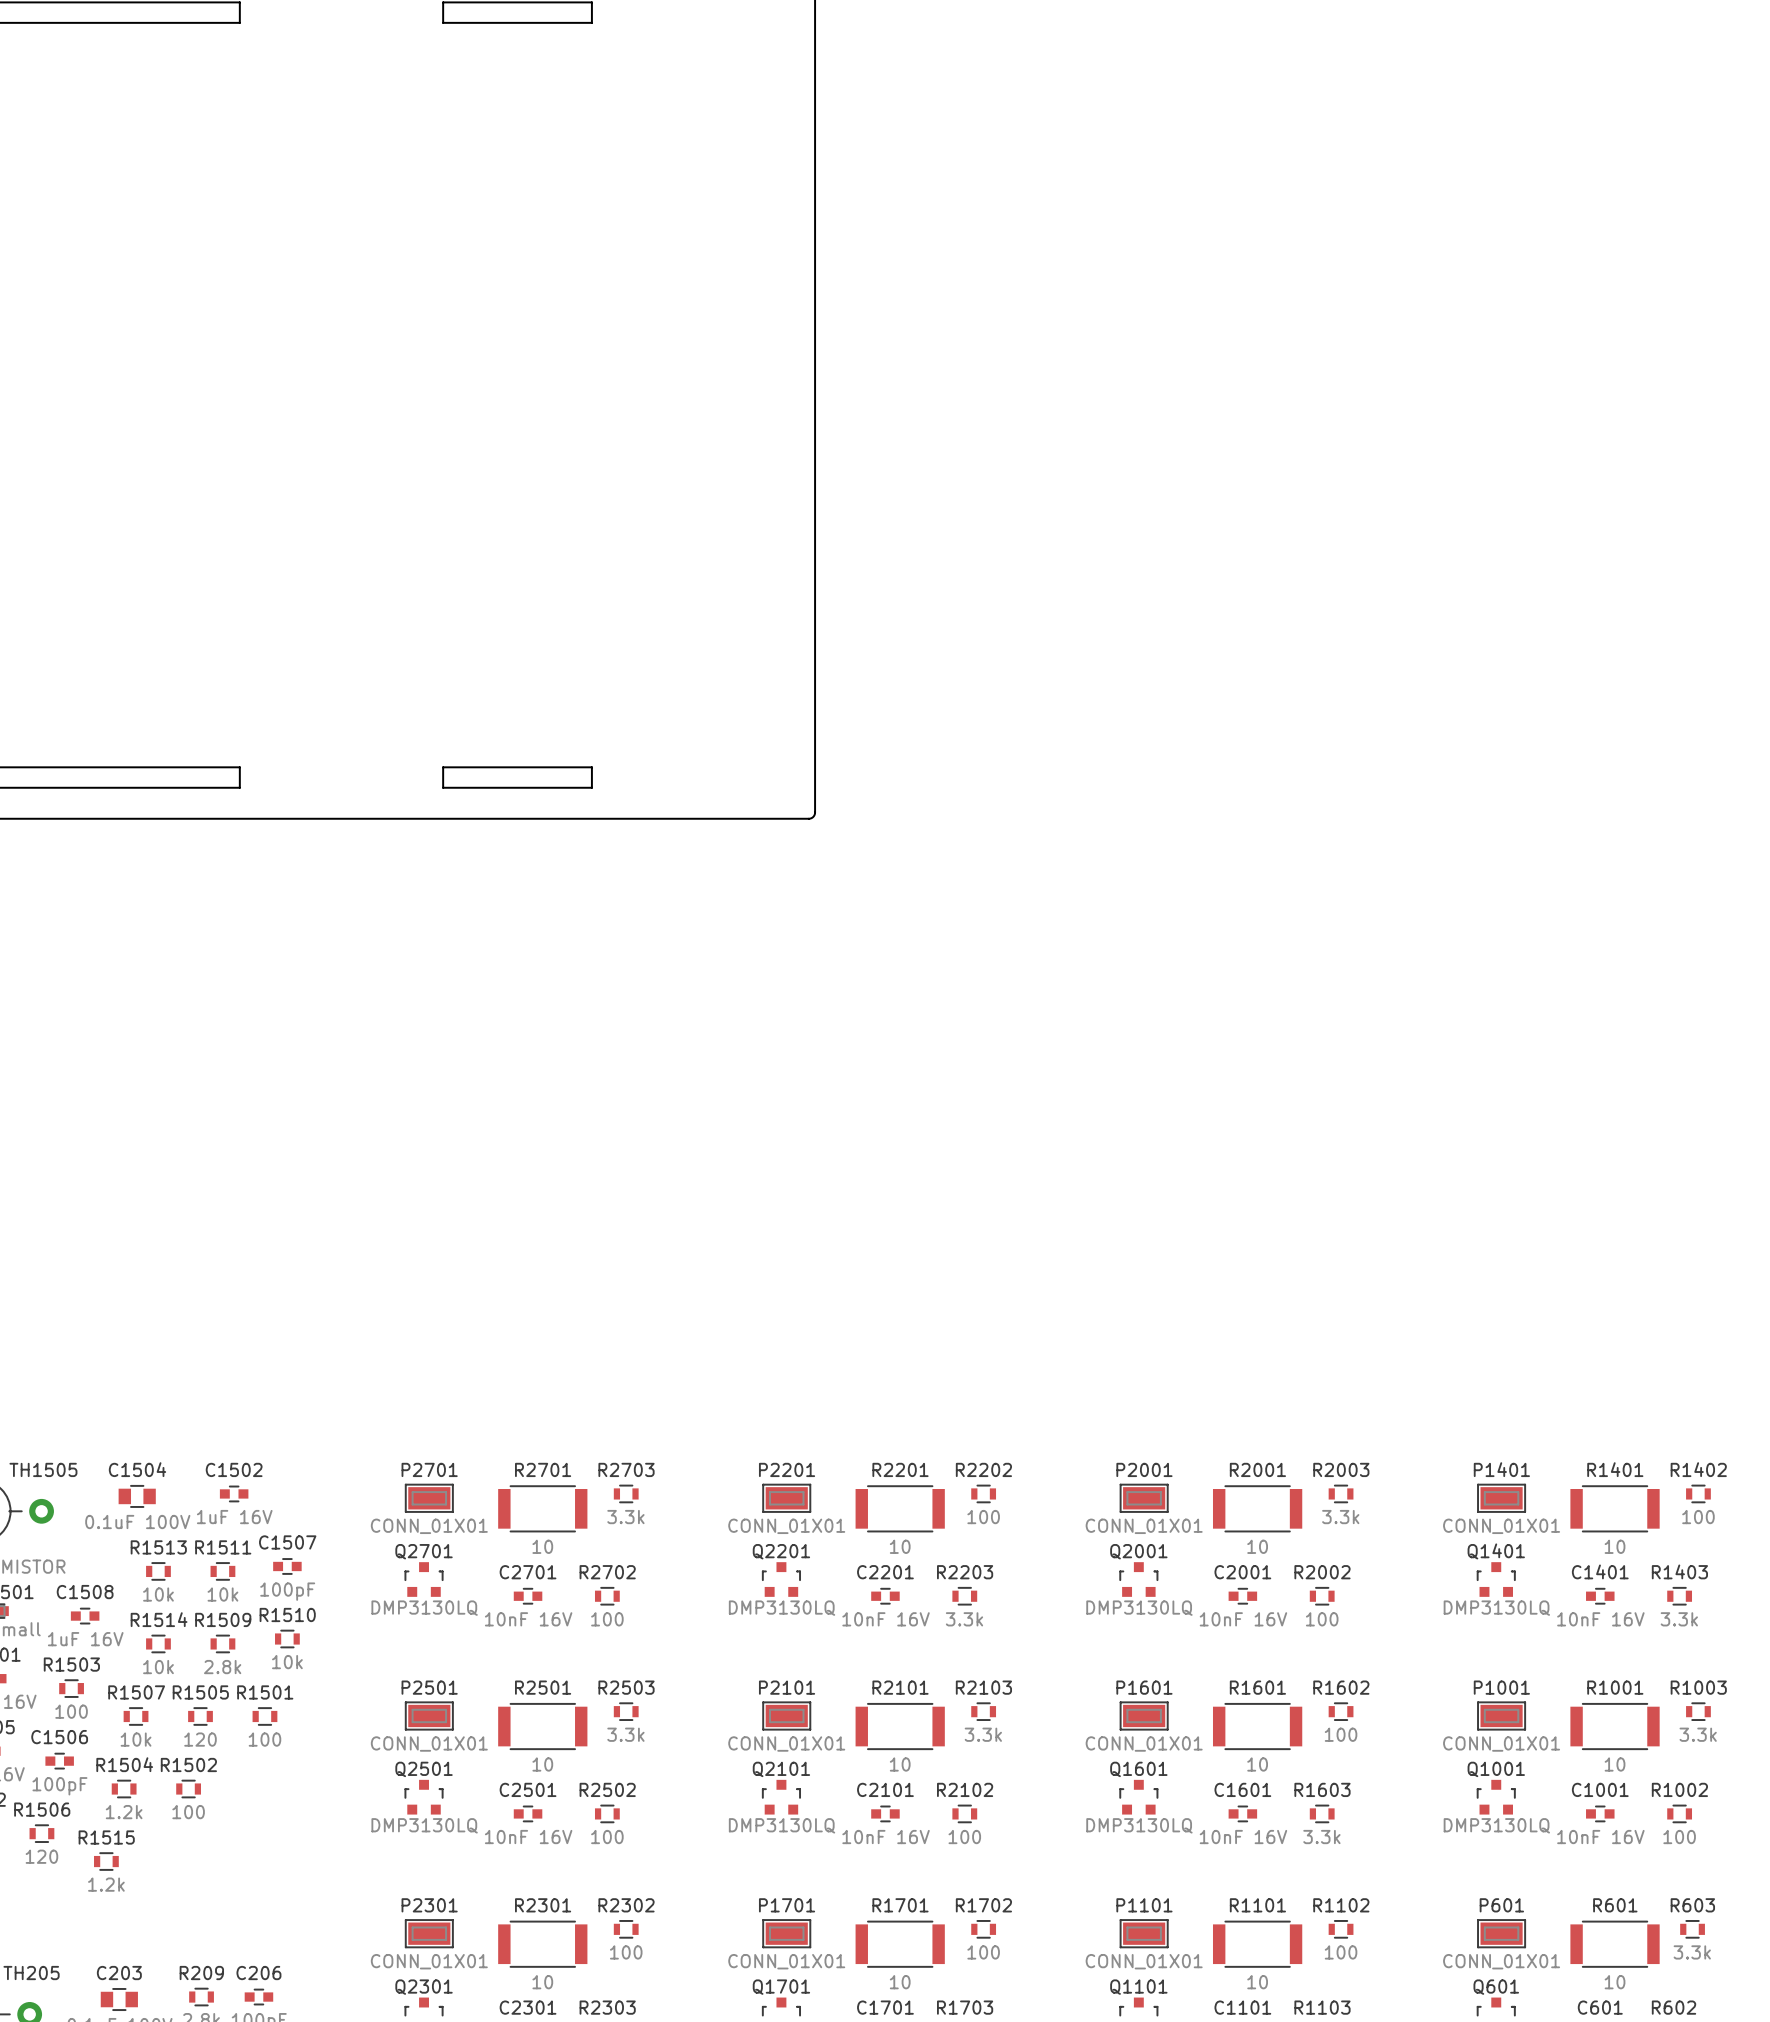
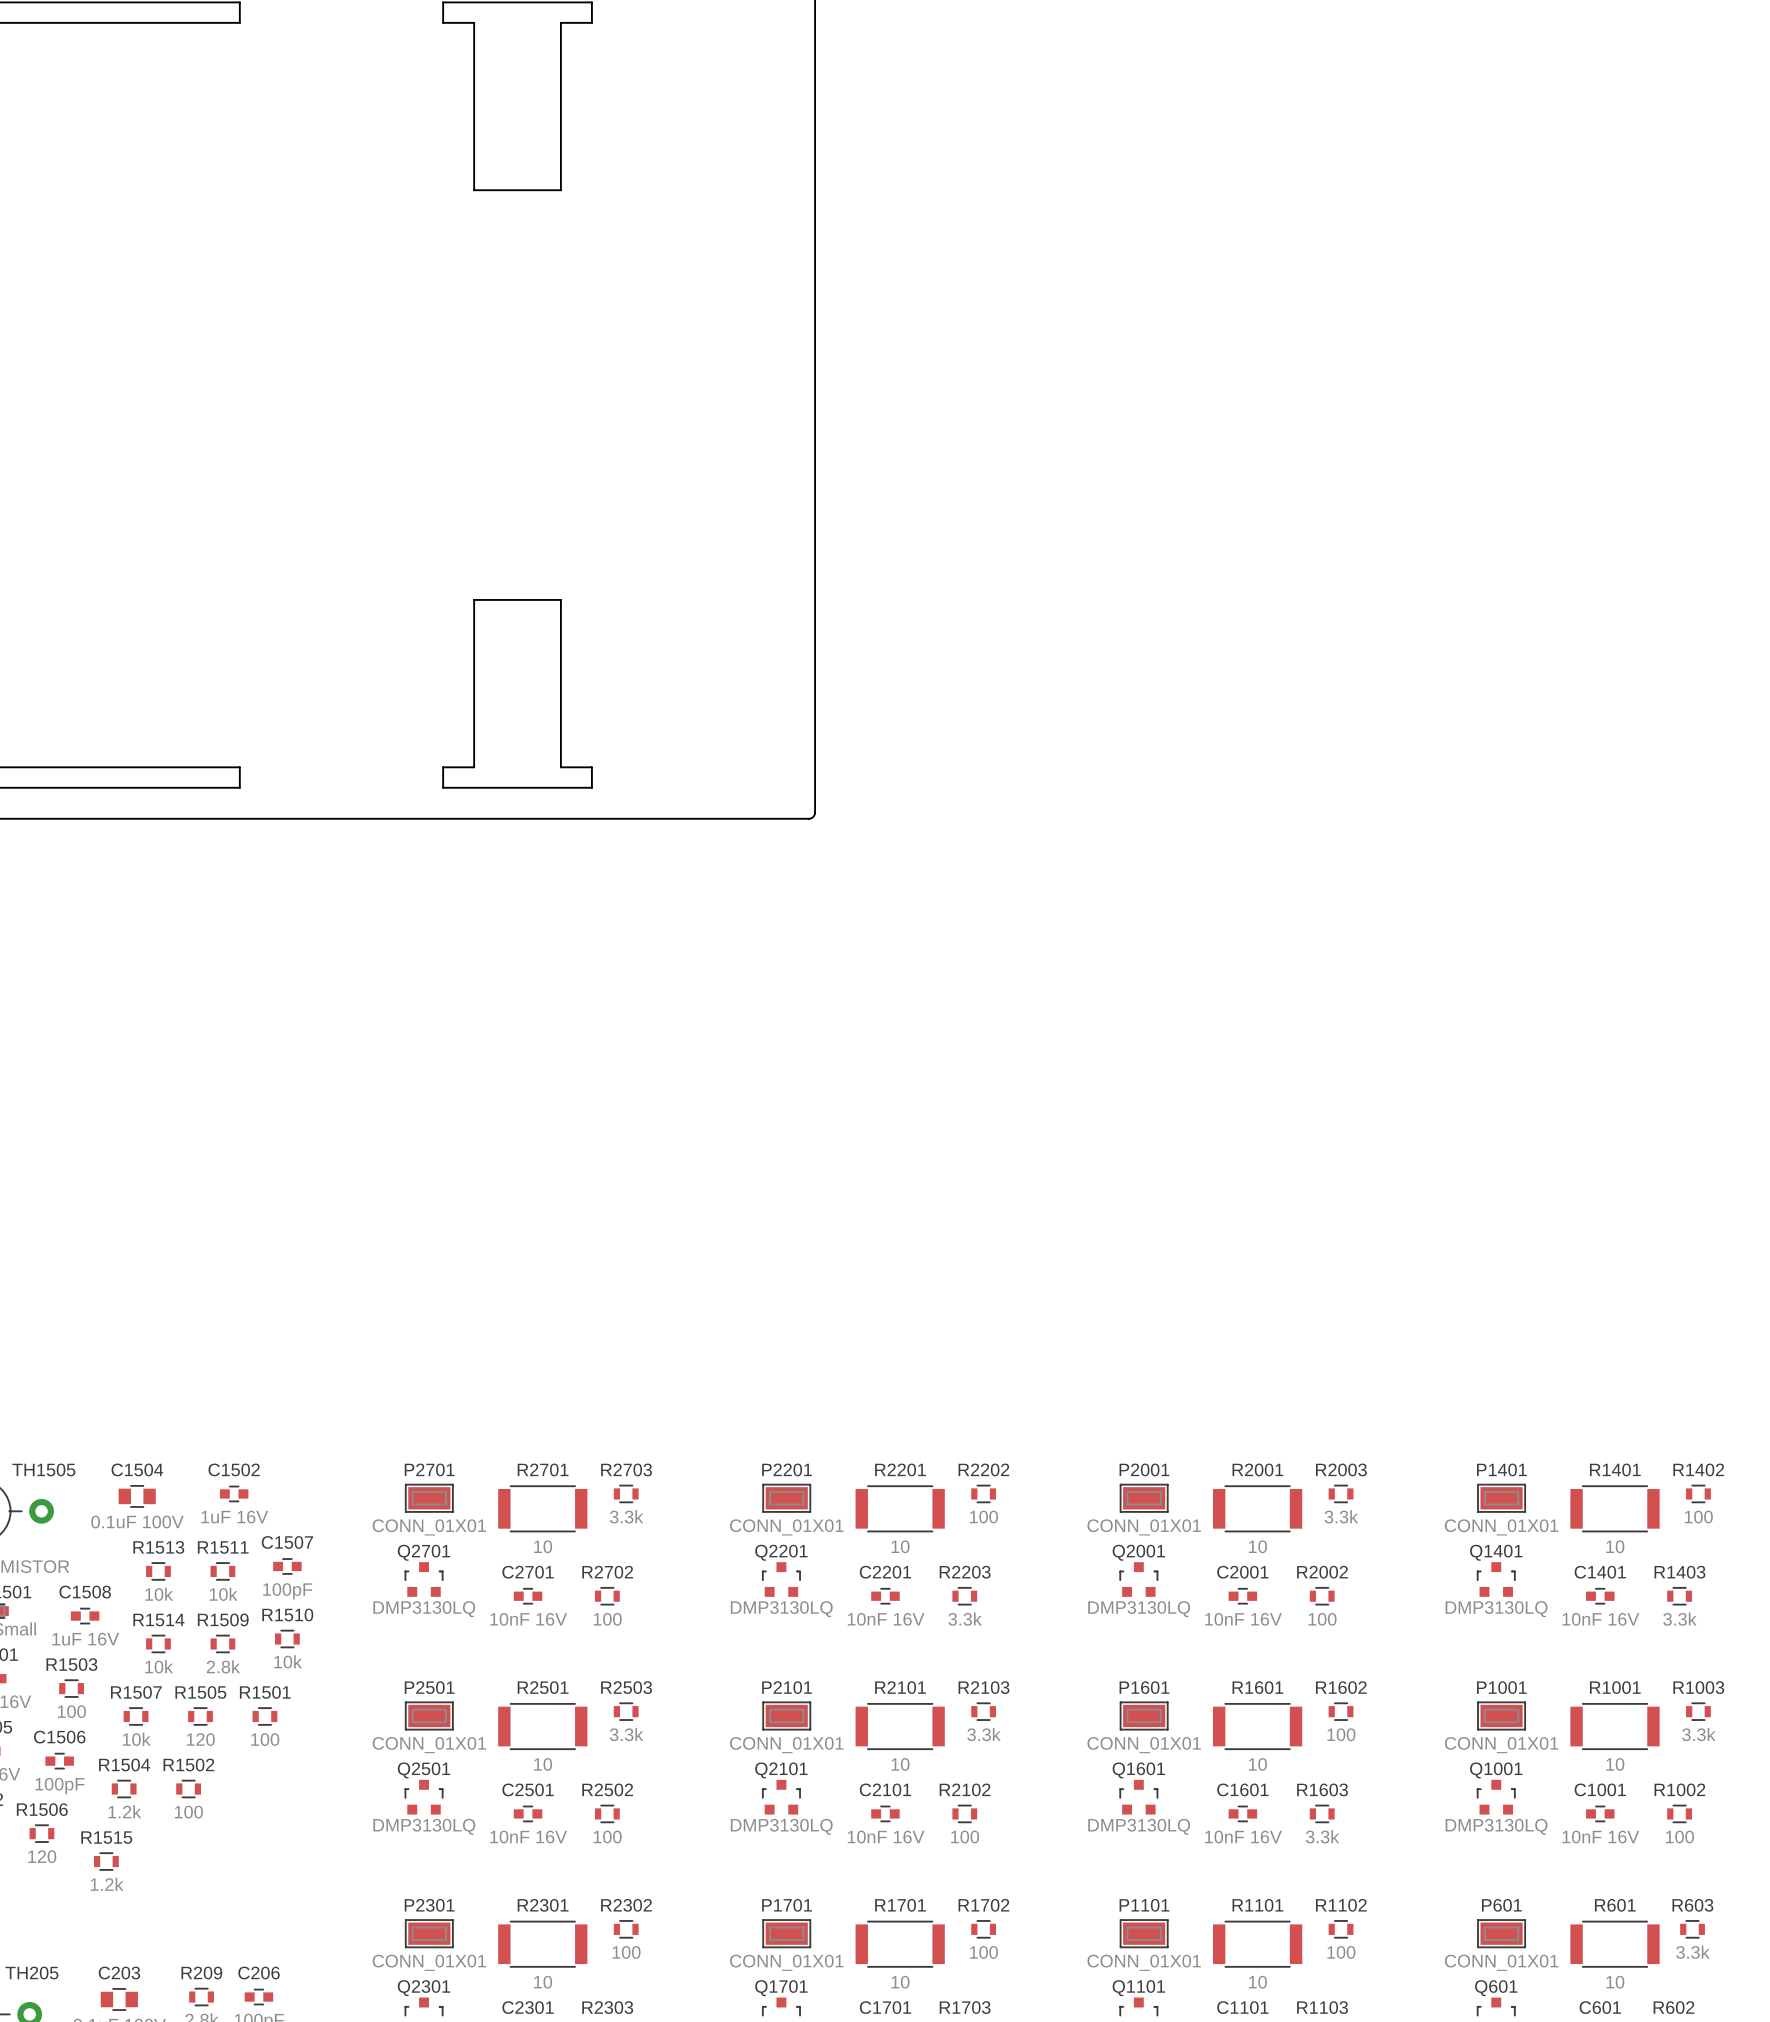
board edge: (474, 22) (560, 22) -> (474, 22) (474, 190) (560, 190) (560, 22)
board edge: (474, 767) (560, 767) -> (474, 767) (474, 599) (560, 599) (560, 767)

